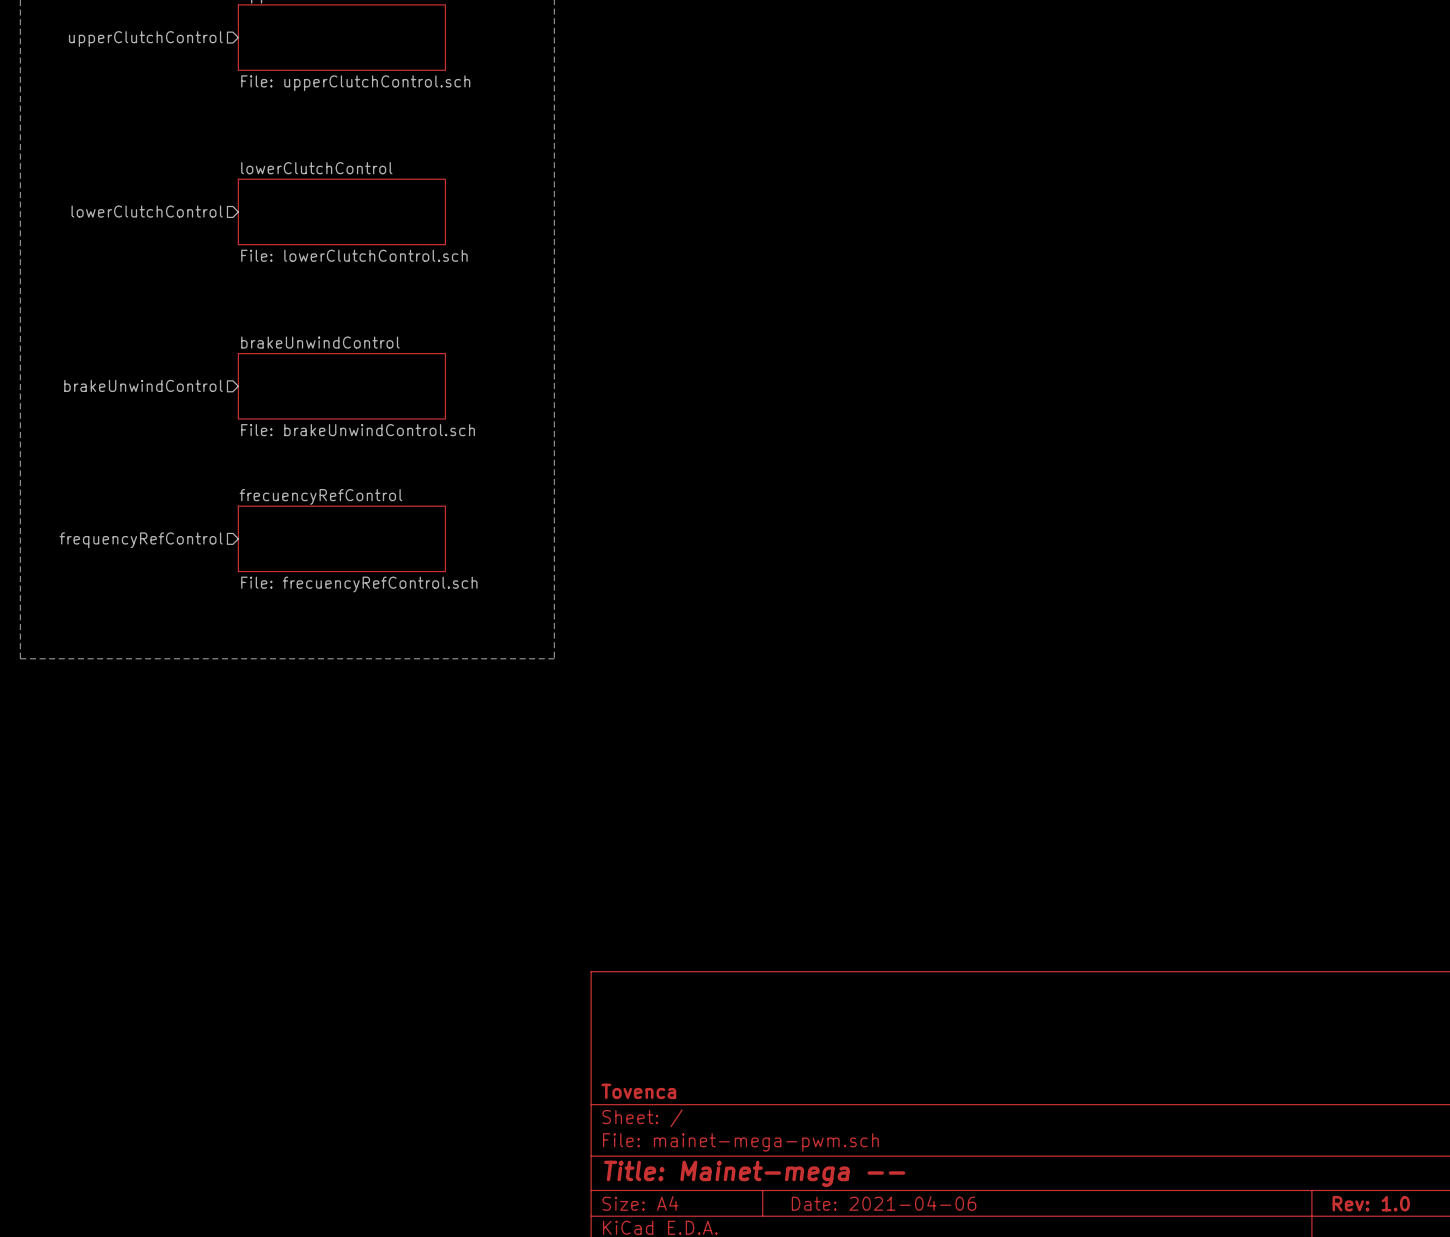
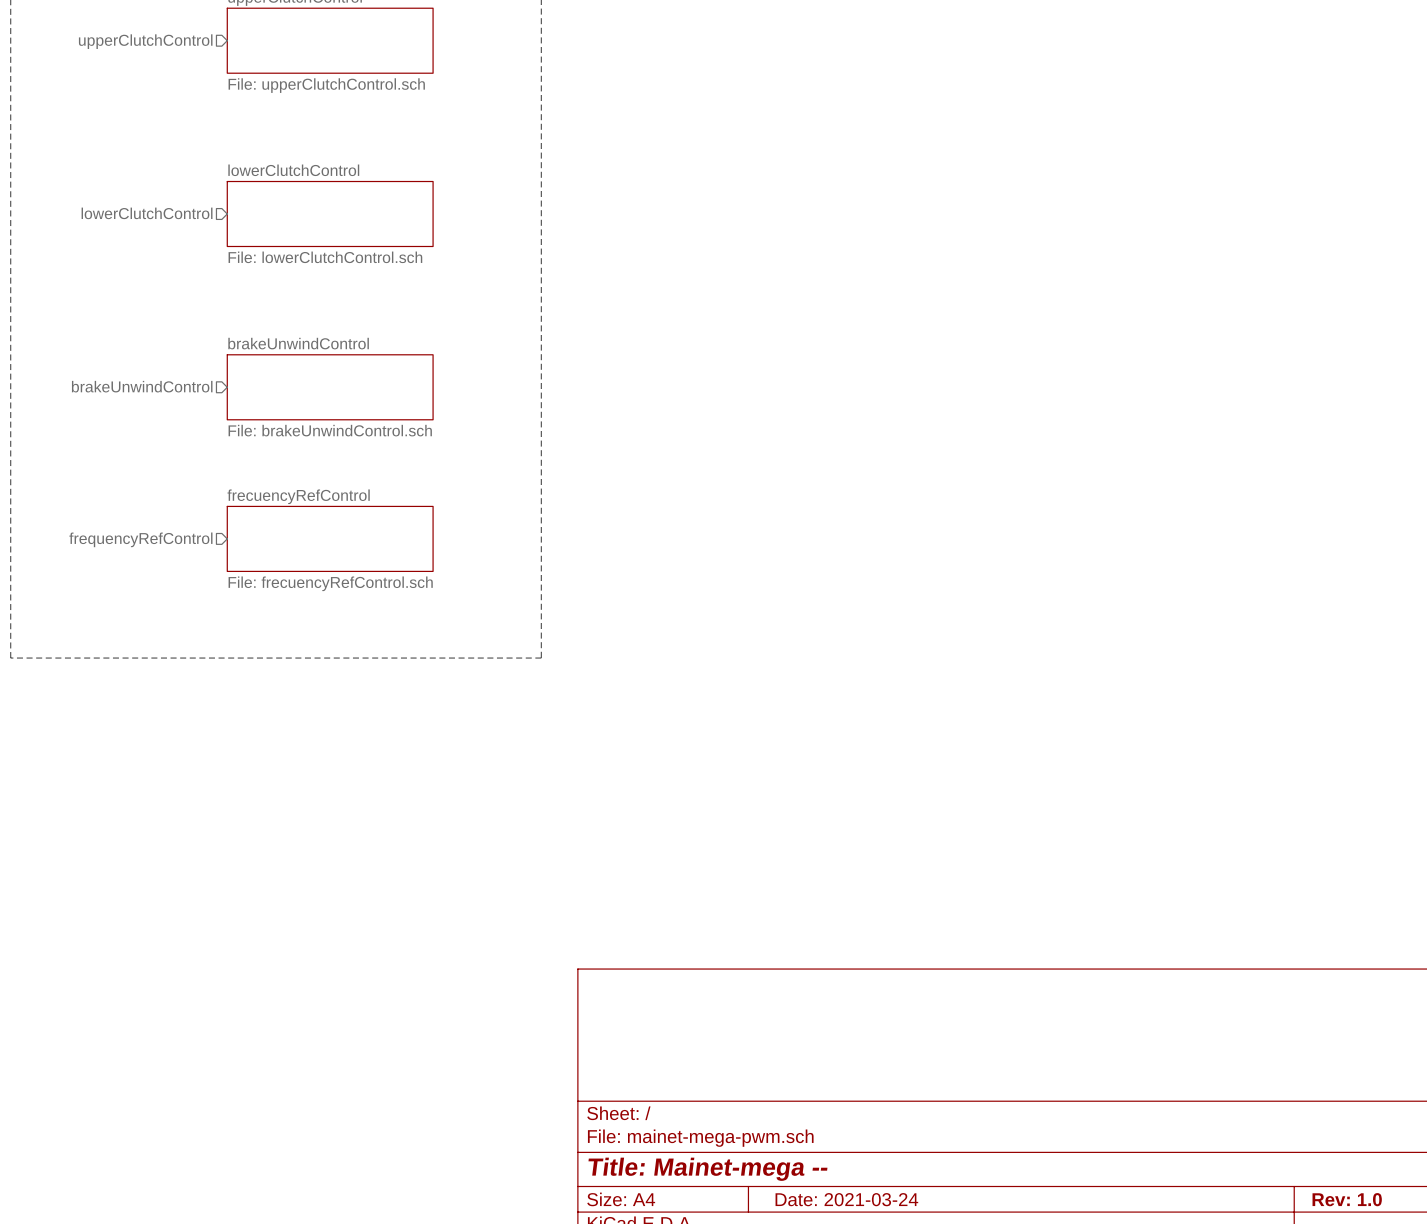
title block: Tovenca (638, 1091) -> none
title block: Date: 2021-04-06 (884, 1203) -> Date: 2021-03-24 (846, 1199)

